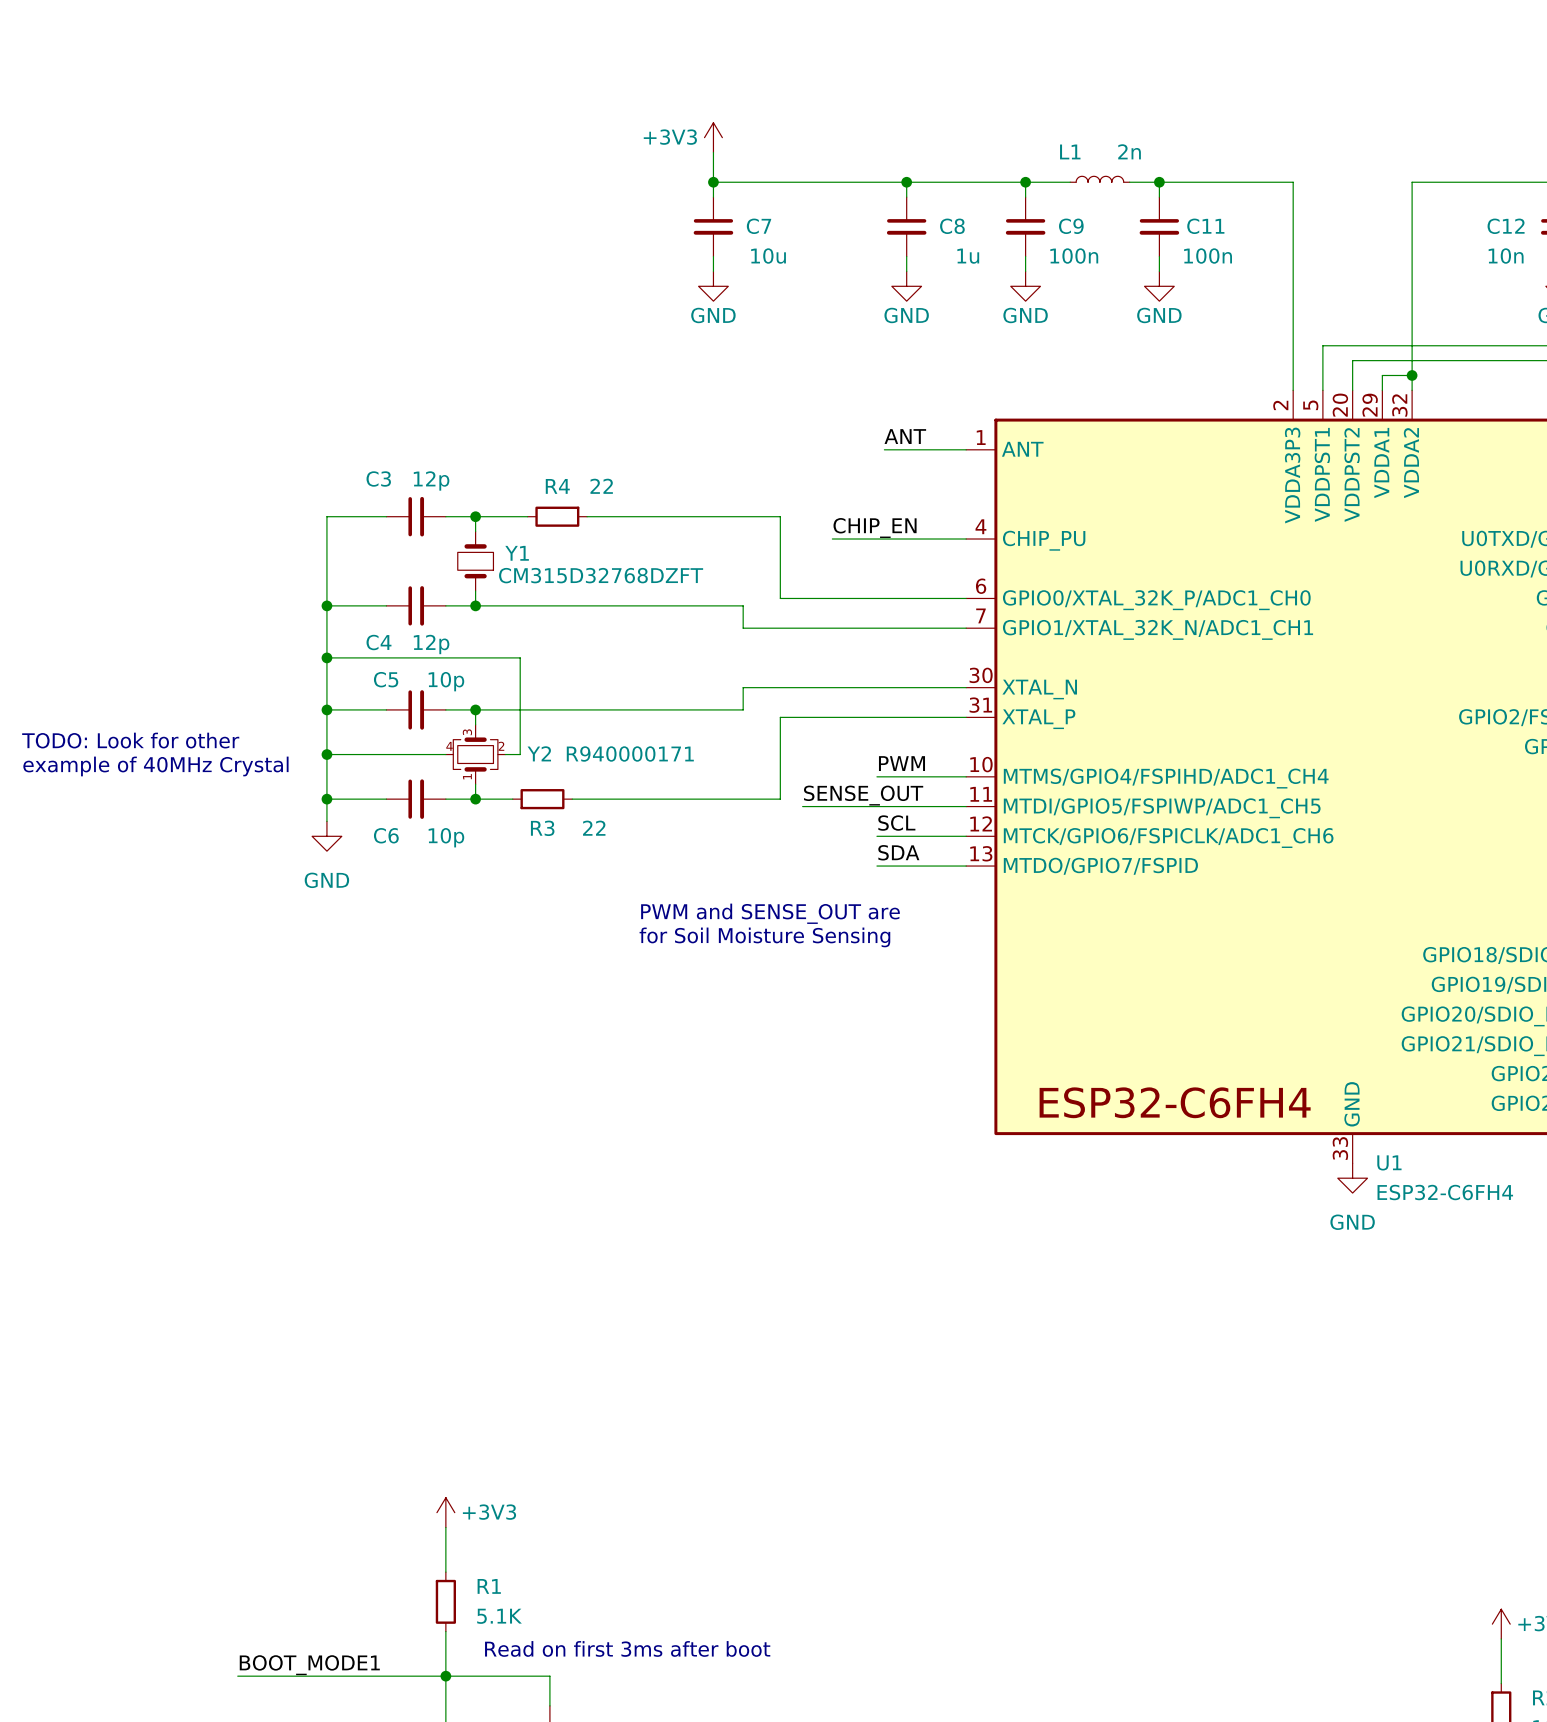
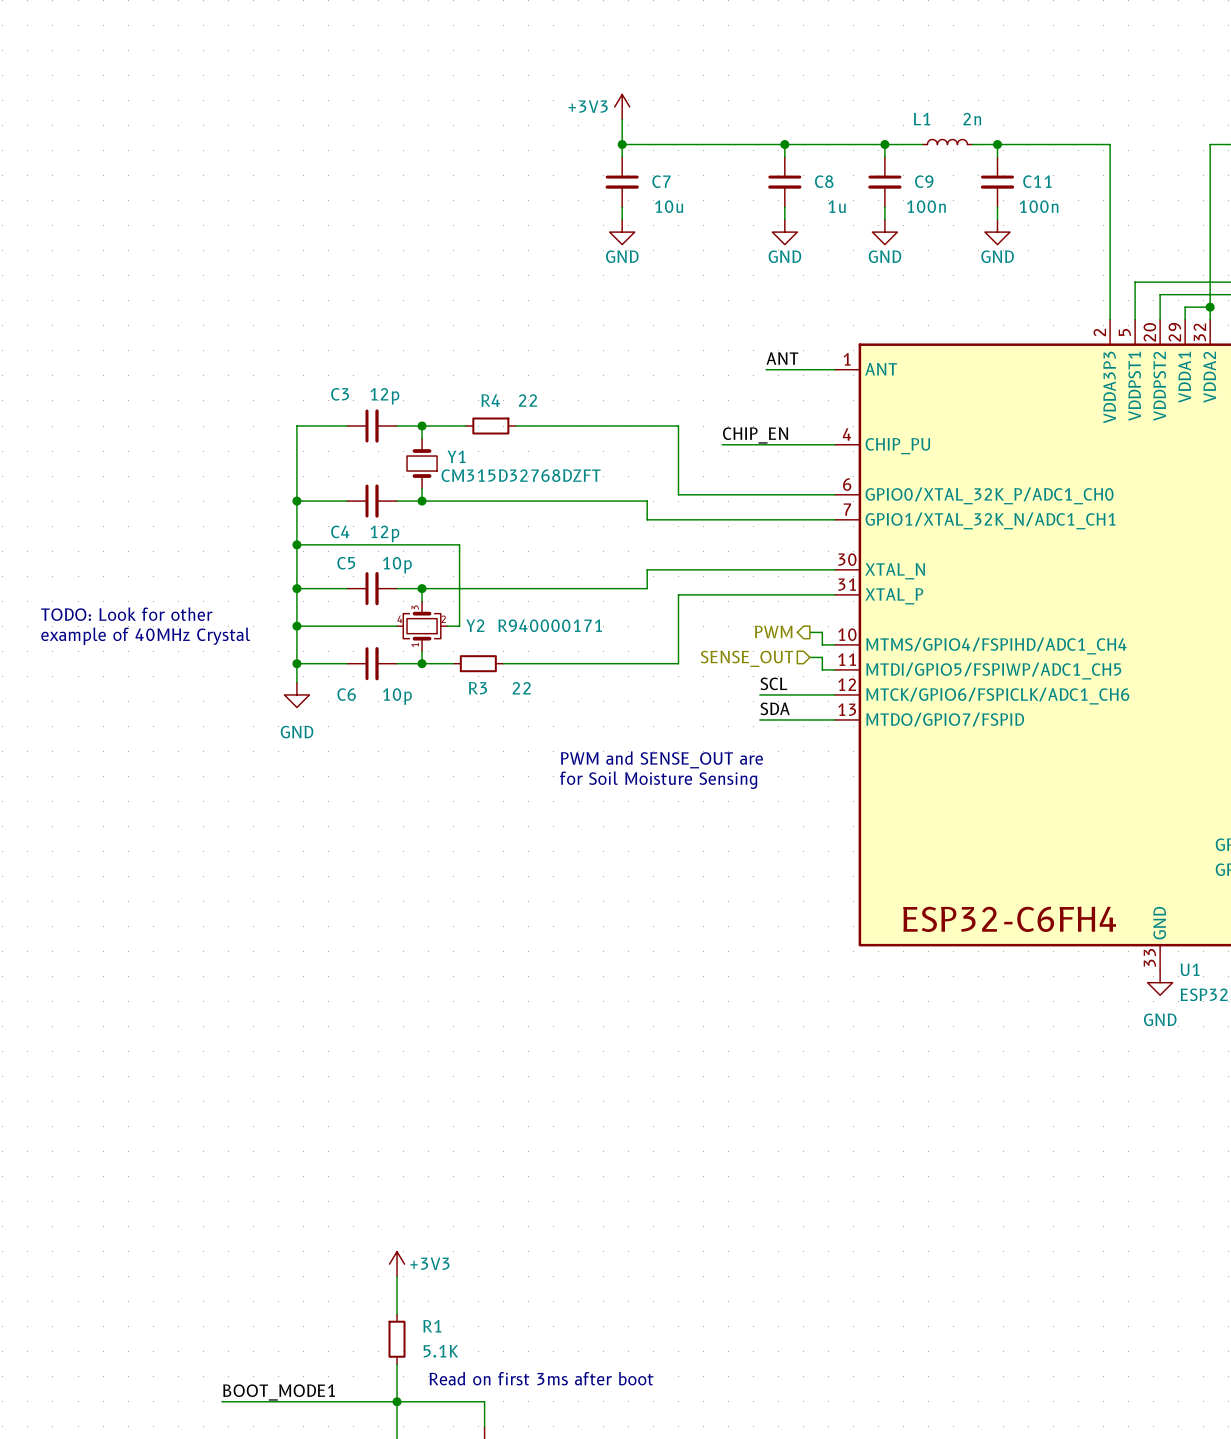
hierarchical label: none -> PWM (773, 631)
label: PWM (901, 763) -> none
wire: (876, 776) (951, 776) -> (809, 632) (822, 632) (822, 644)
hierarchical label: none -> SENSE_OUT (747, 658)
label: SENSE_OUT (863, 795) -> none
wire: (802, 806) (951, 806) -> (809, 657) (822, 657) (822, 669)

